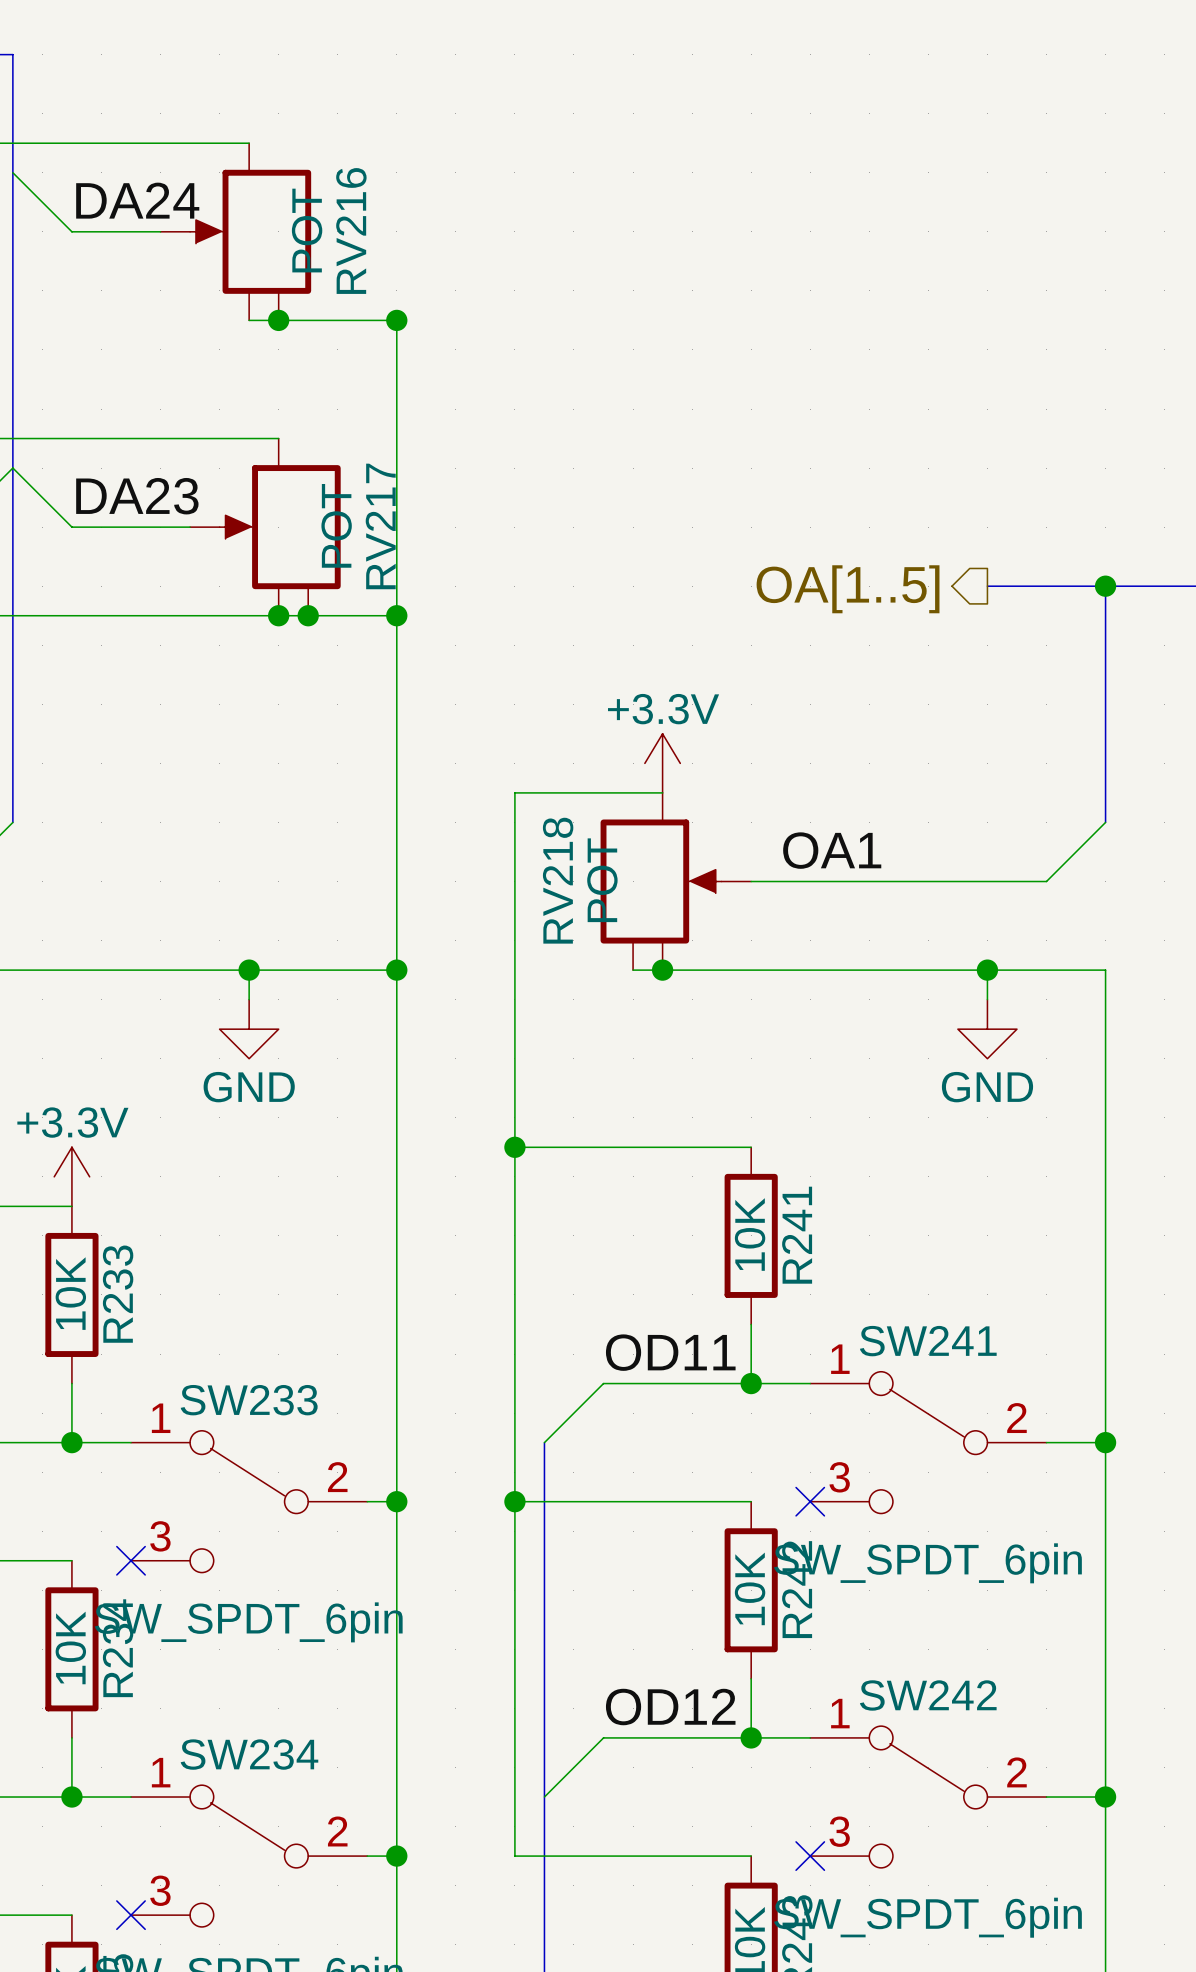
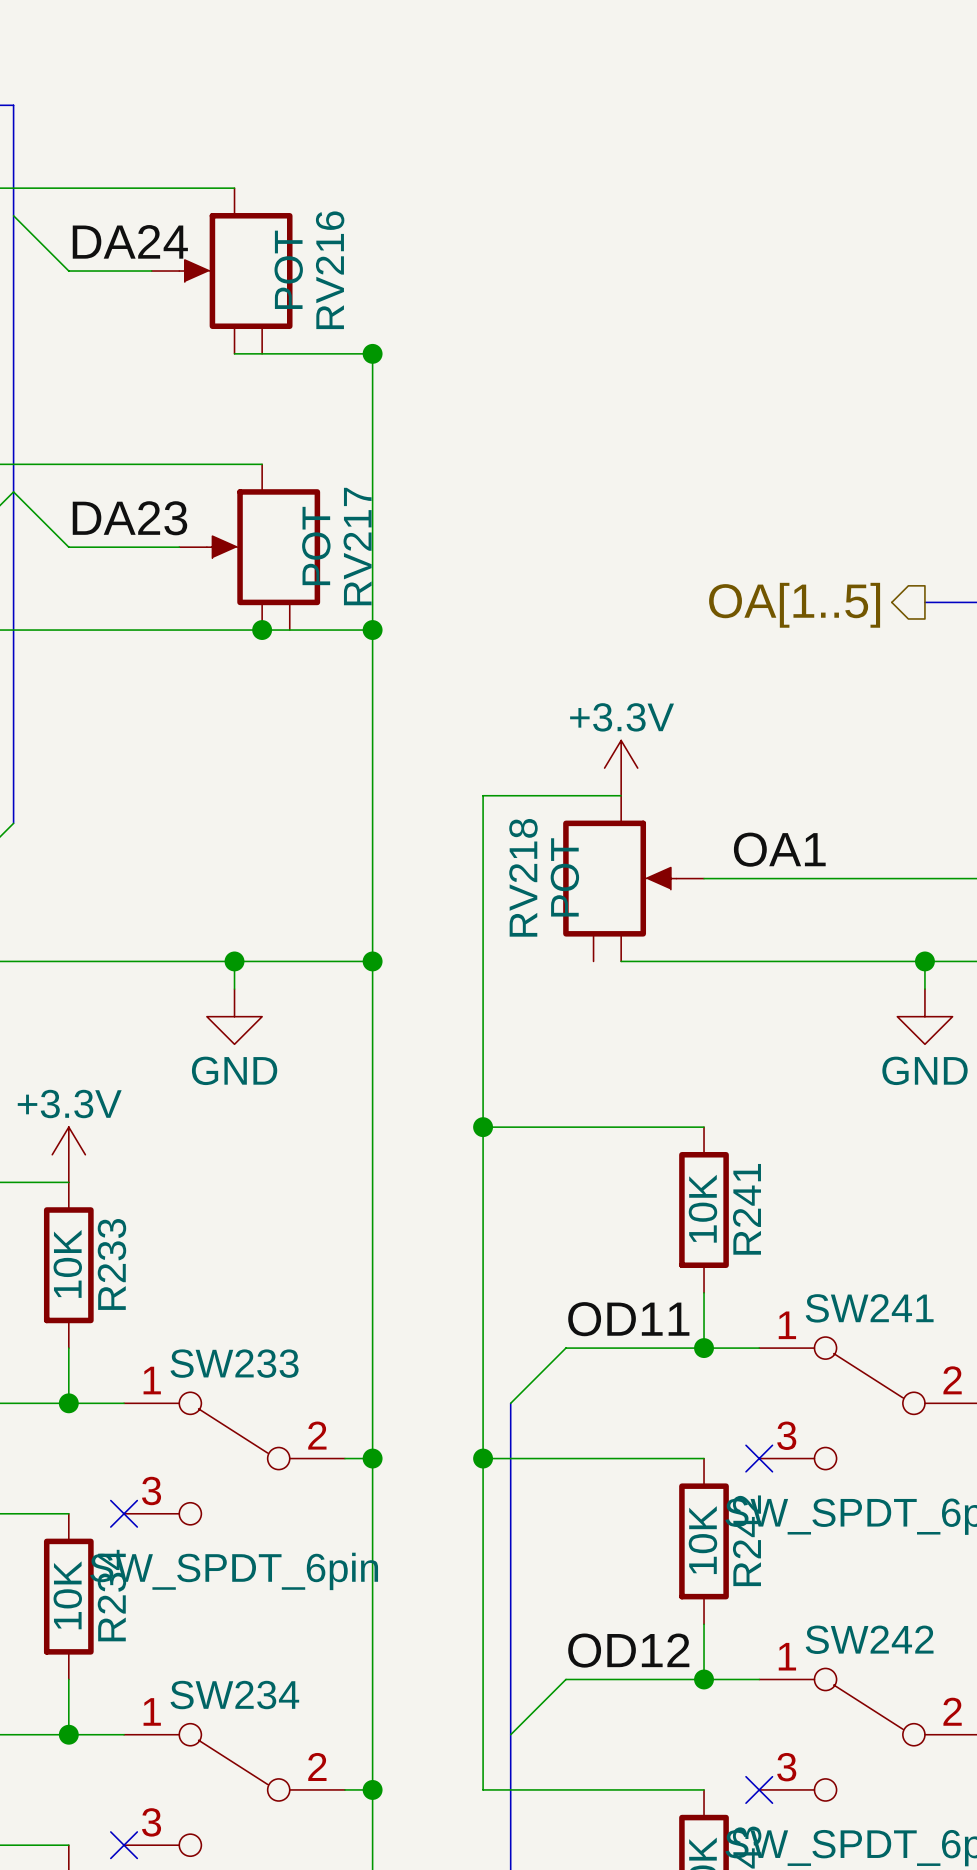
junction: (278, 320) -> none
junction: (308, 615) -> none
wire: (633, 970) (662, 970) -> none
junction: (662, 970) -> none

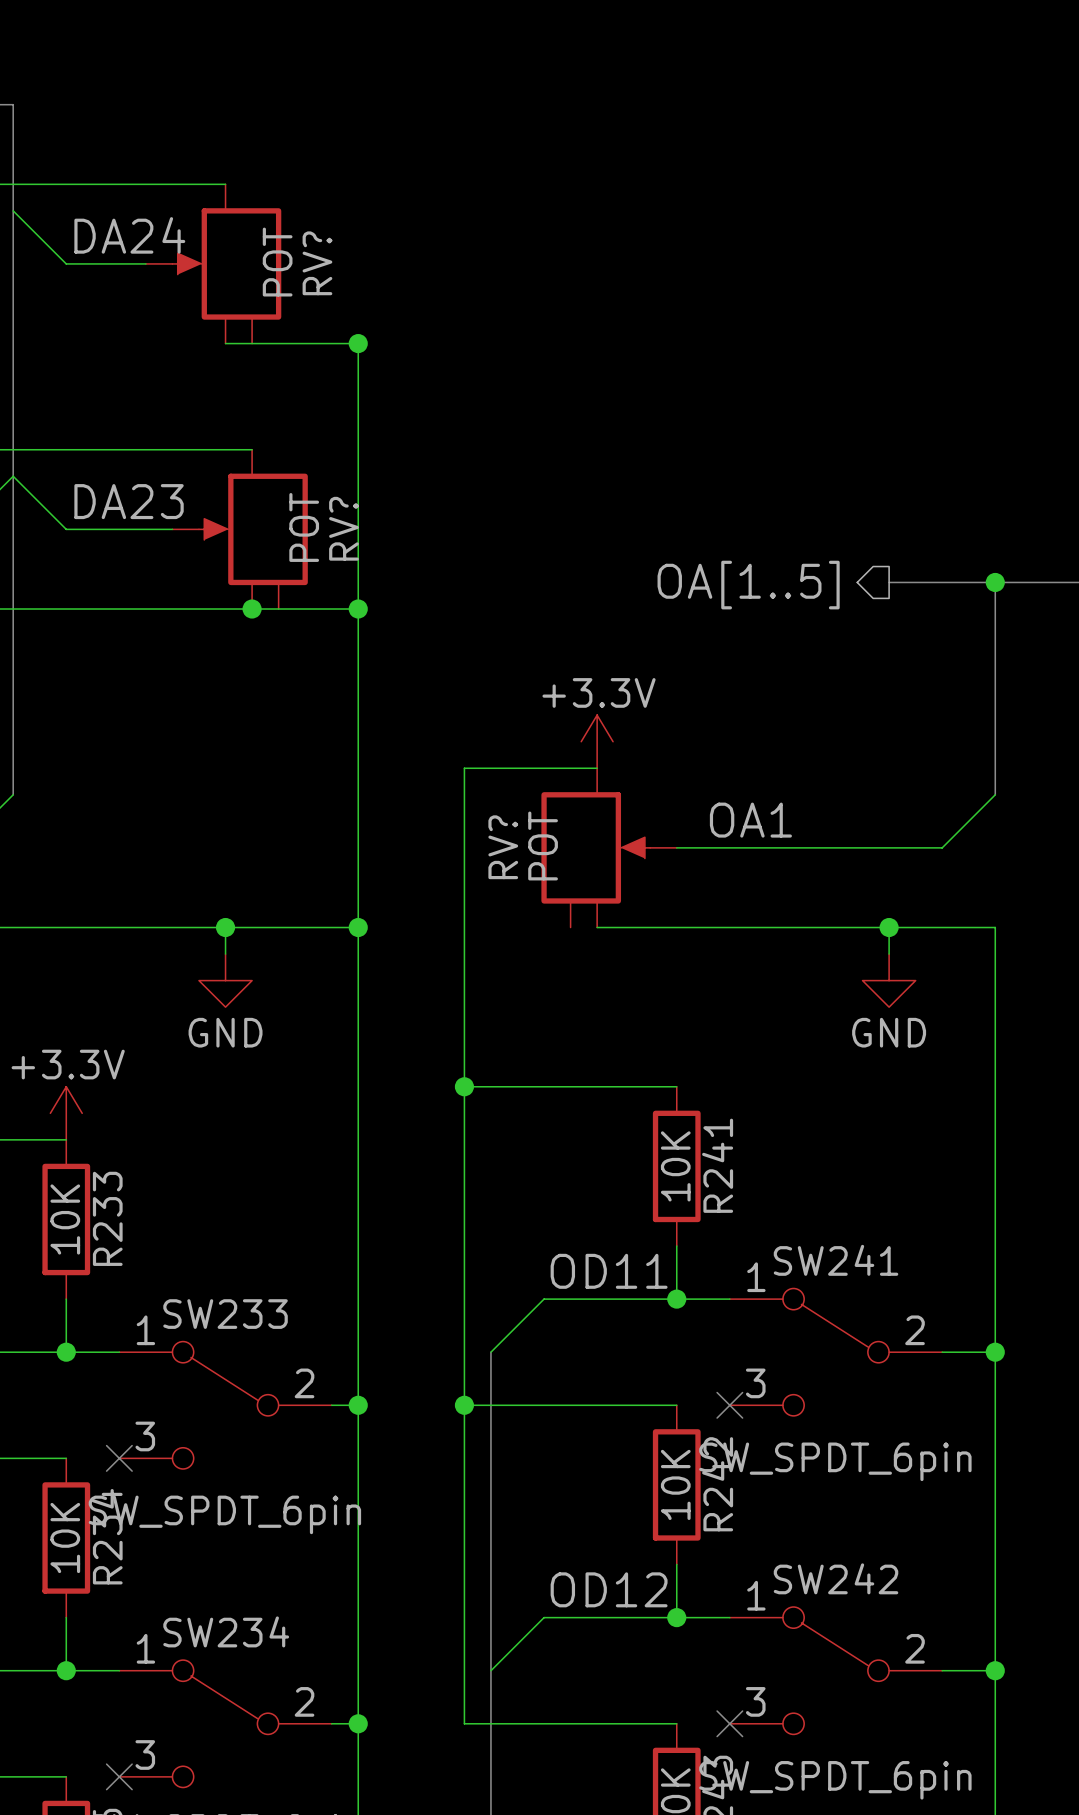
RV216 name: RV216 (330, 270) -> RV? (317, 263)
RV217 name: RV217 (357, 546) -> RV? (343, 528)
RV218 name: RV218 (523, 877) -> RV? (503, 847)

